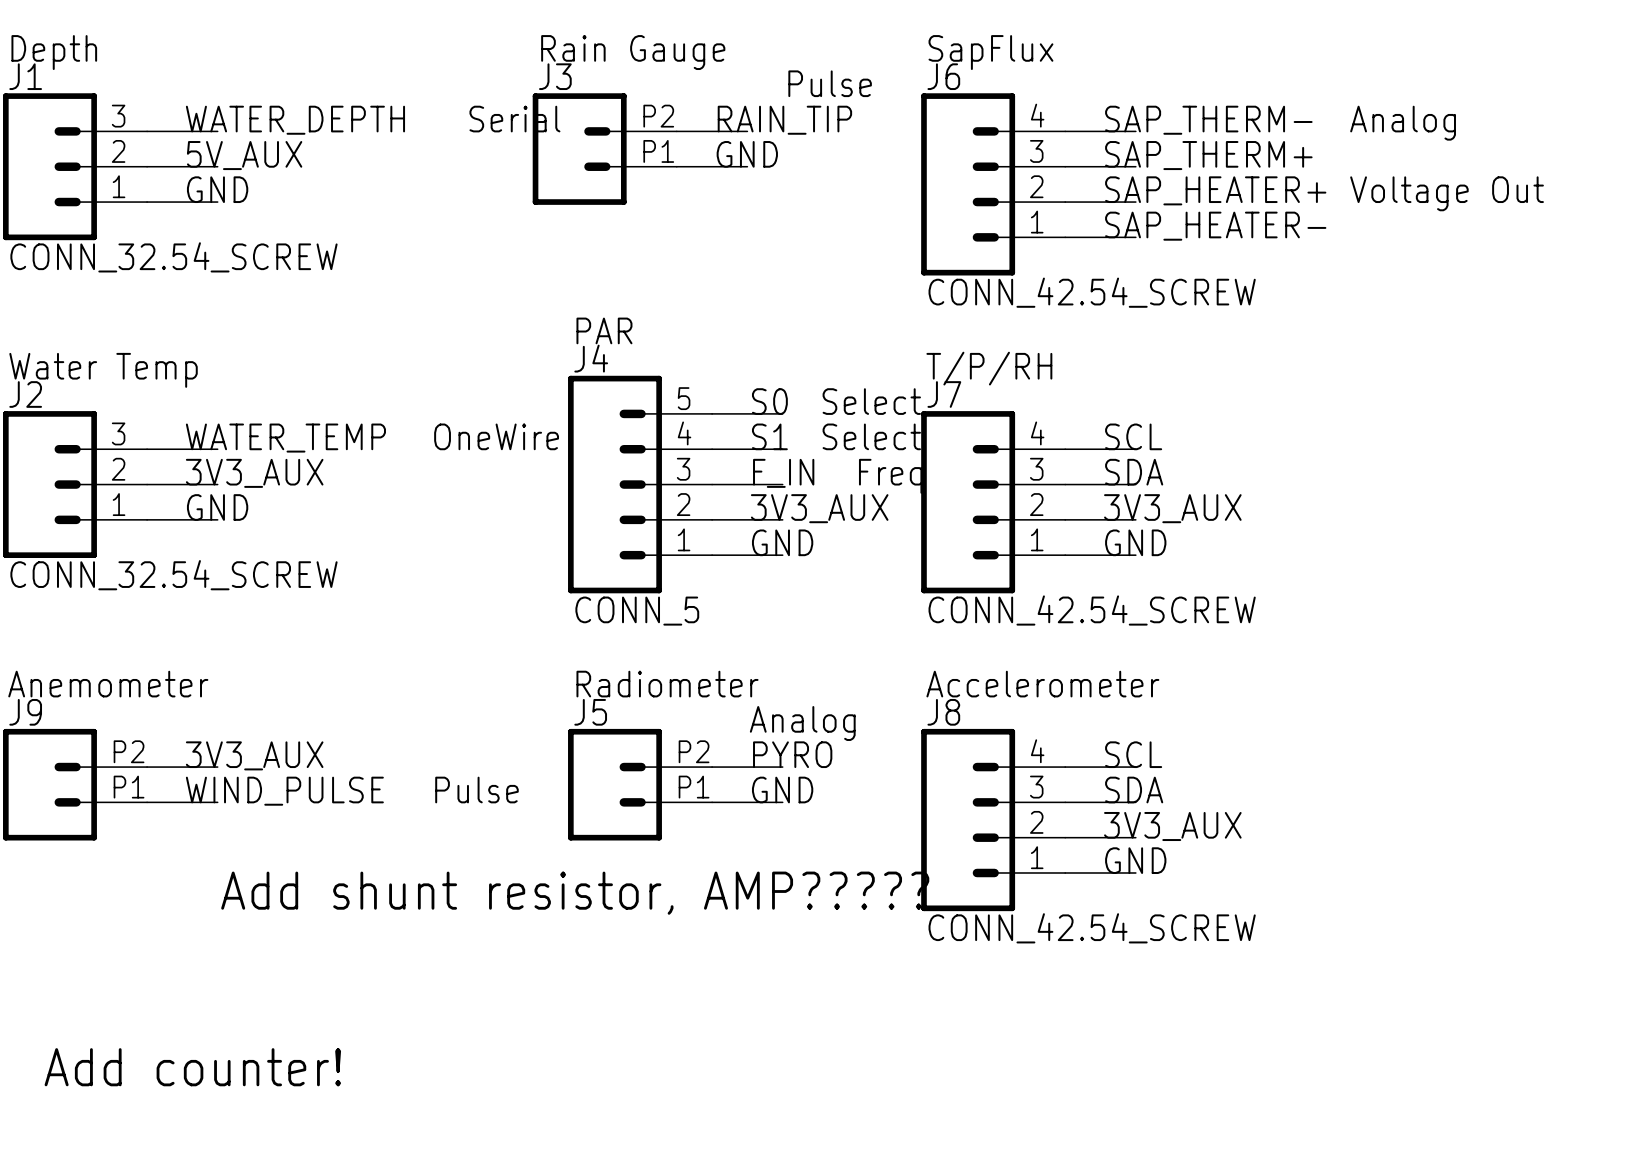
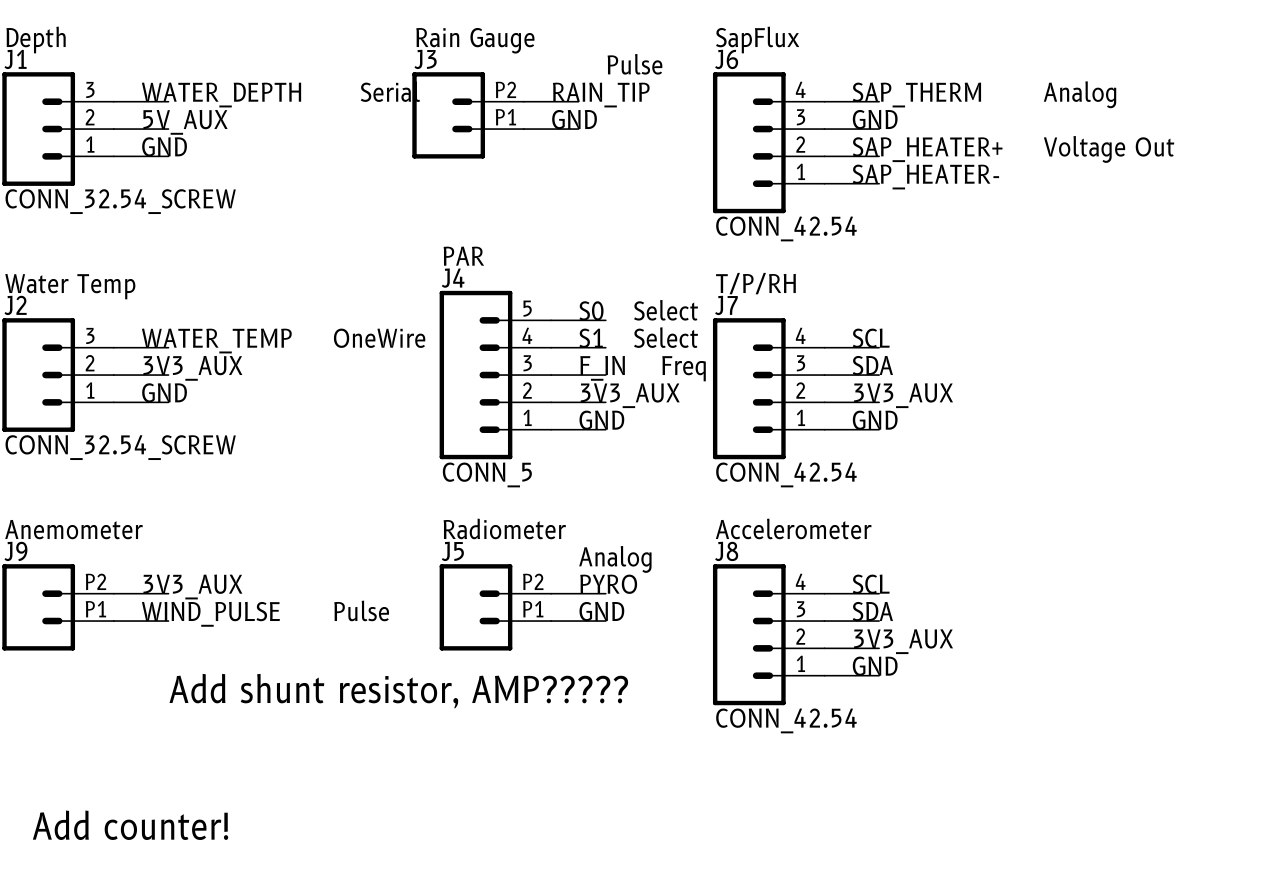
label: SAP_THERM- (1208, 120) -> SAP_THERM (916, 95)
label: SAP_THERM+ (1208, 155) -> GND (875, 119)
J6 value: CONN_42.54_SCREW (1092, 292) -> CONN_42.54 (786, 228)
J7 value: CONN_42.54_SCREW (1092, 610) -> CONN_42.54 (786, 474)
J8 value: CONN_42.54_SCREW (1092, 928) -> CONN_42.54 (786, 720)

